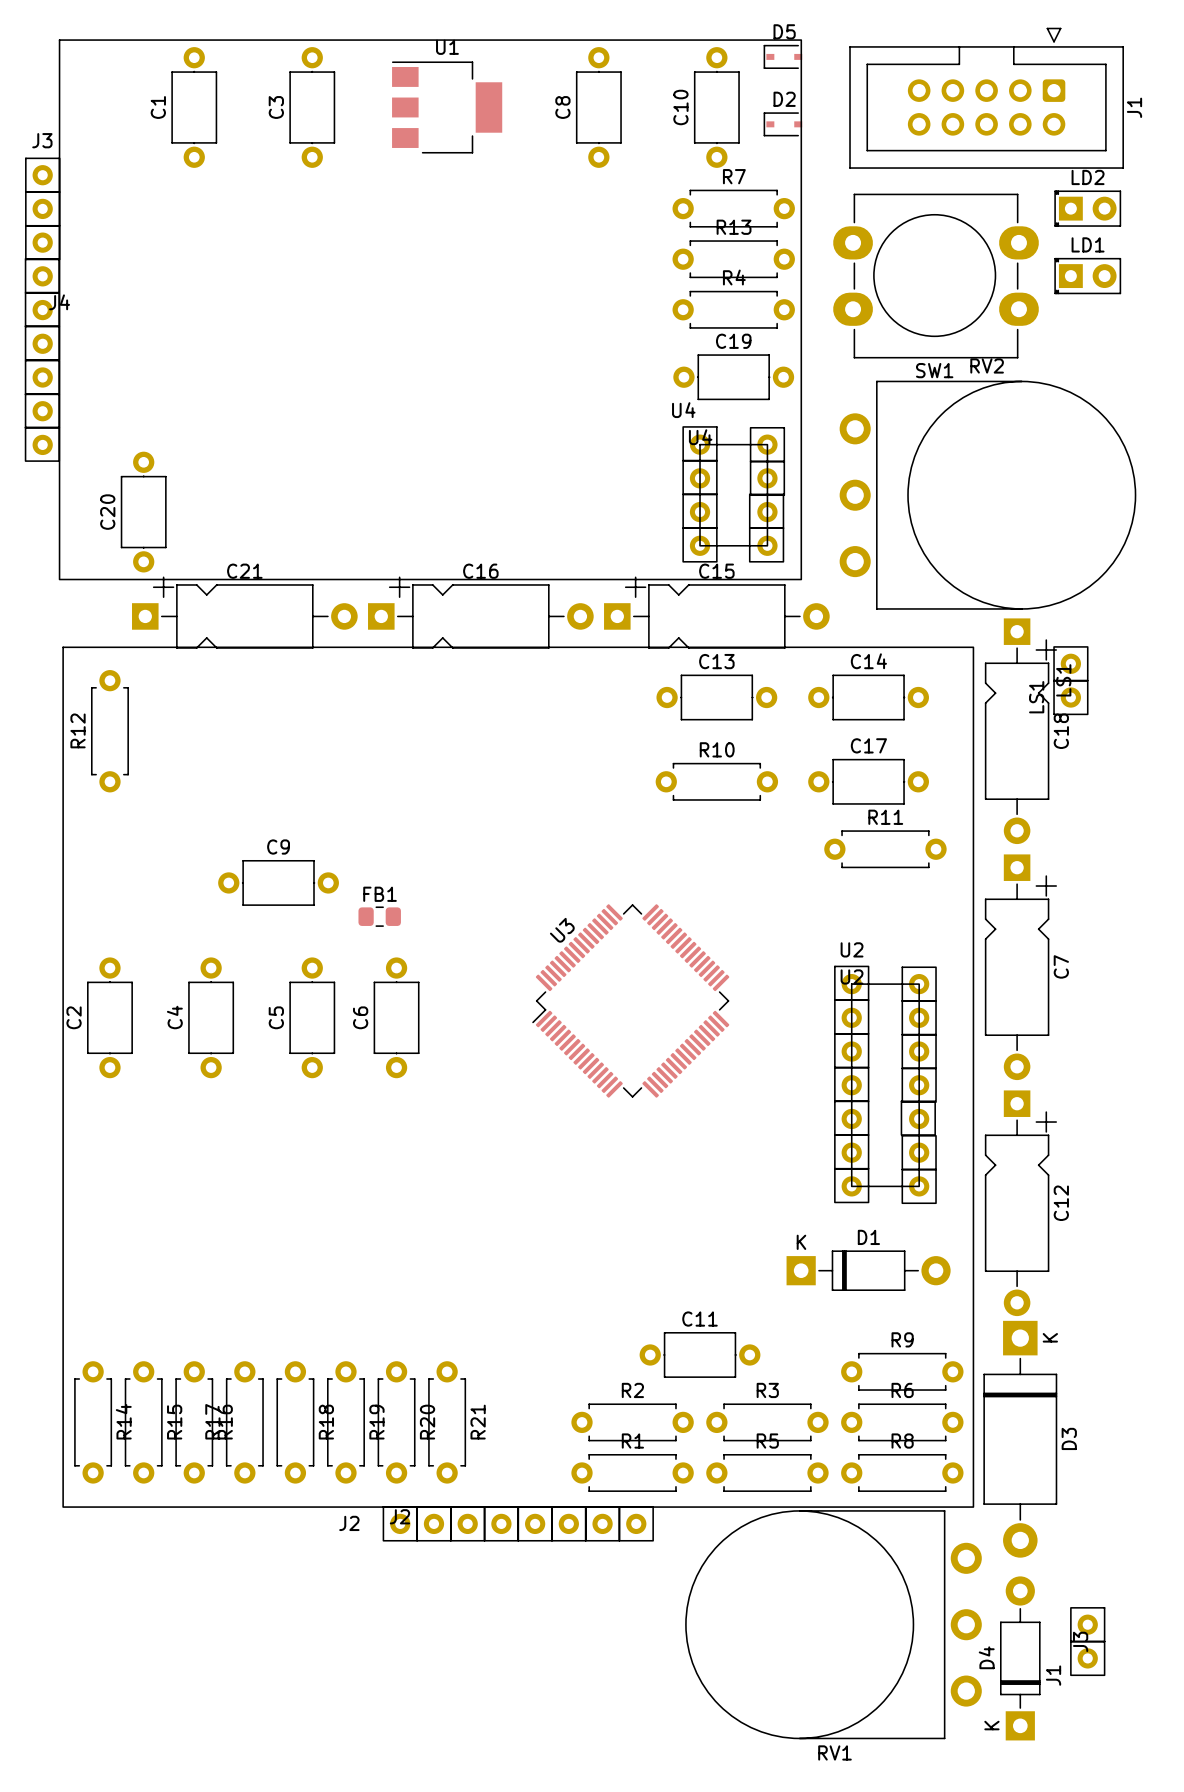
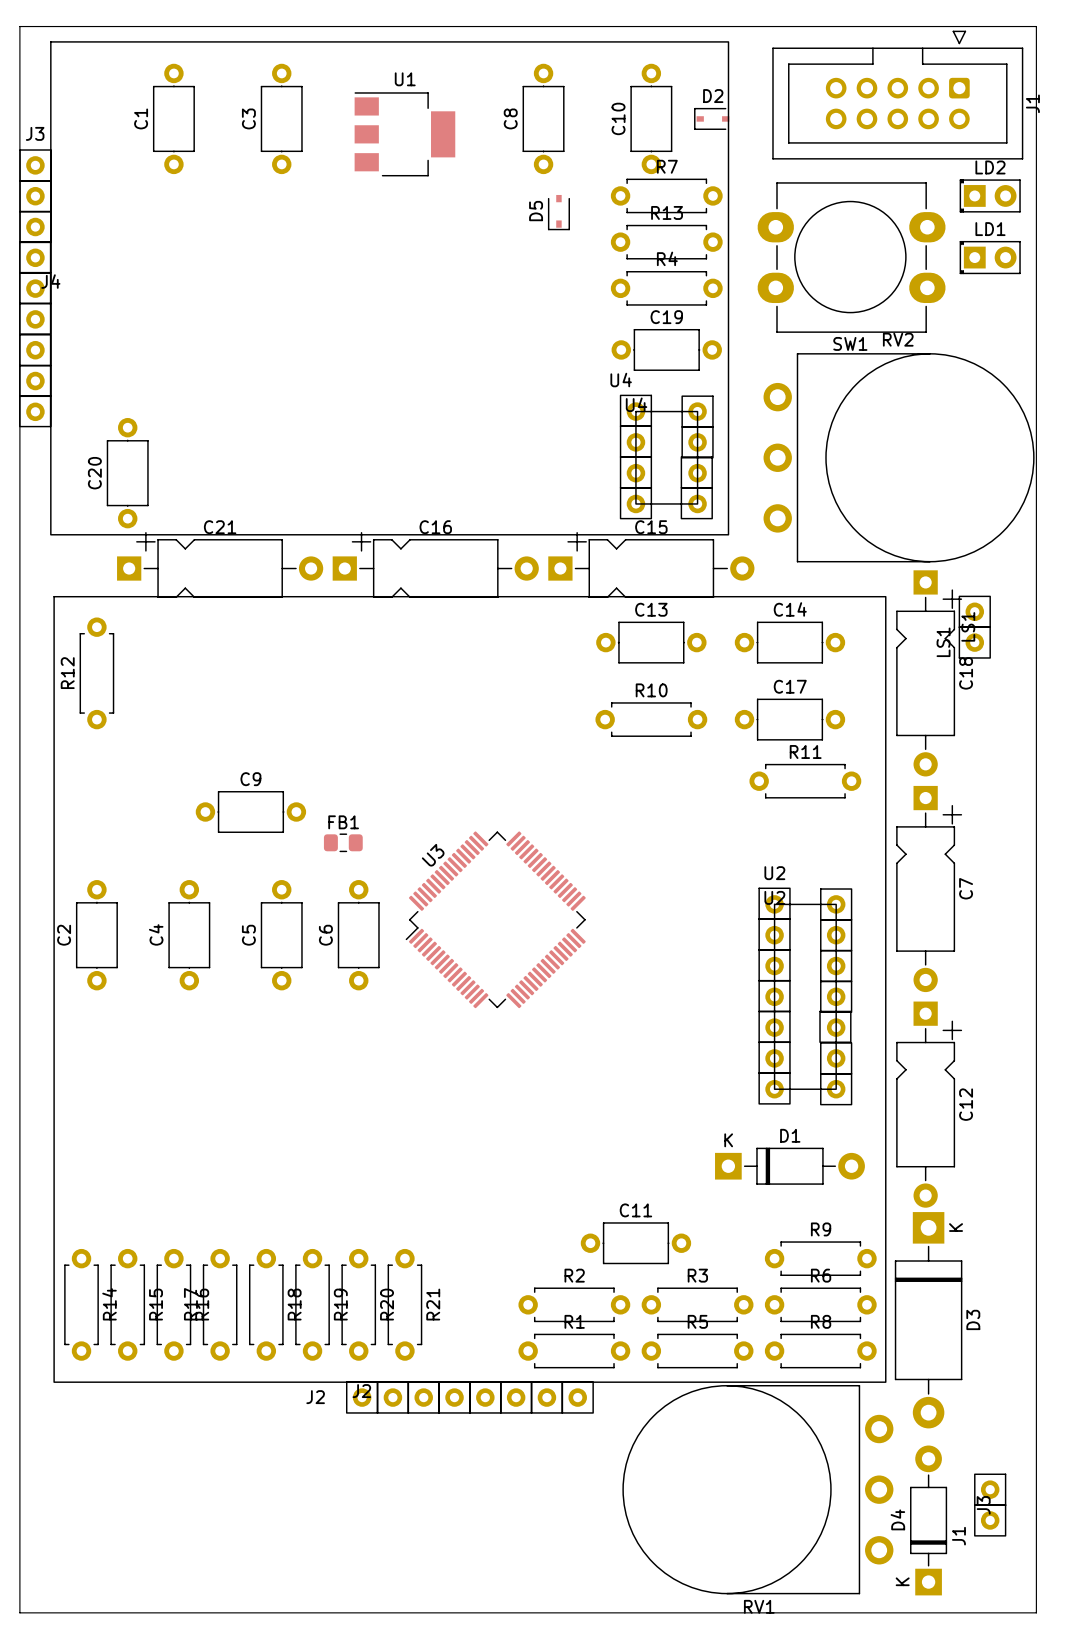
board edge: none -> (19, 26) (1036, 26) (1036, 1612) (19, 1612) (19, 26)
D5 rotation: 0° (782, 56) -> 90° counterclockwise (558, 212)
D5 position: (782, 56) -> (558, 212)
C1 position: (194, 107) -> (173, 118)
C3 position: (312, 107) -> (281, 118)
U1 position: (447, 107) -> (404, 134)
C8 position: (598, 107) -> (543, 118)
C10 position: (716, 107) -> (651, 118)
U3 position: (630, 1000) -> (495, 919)

